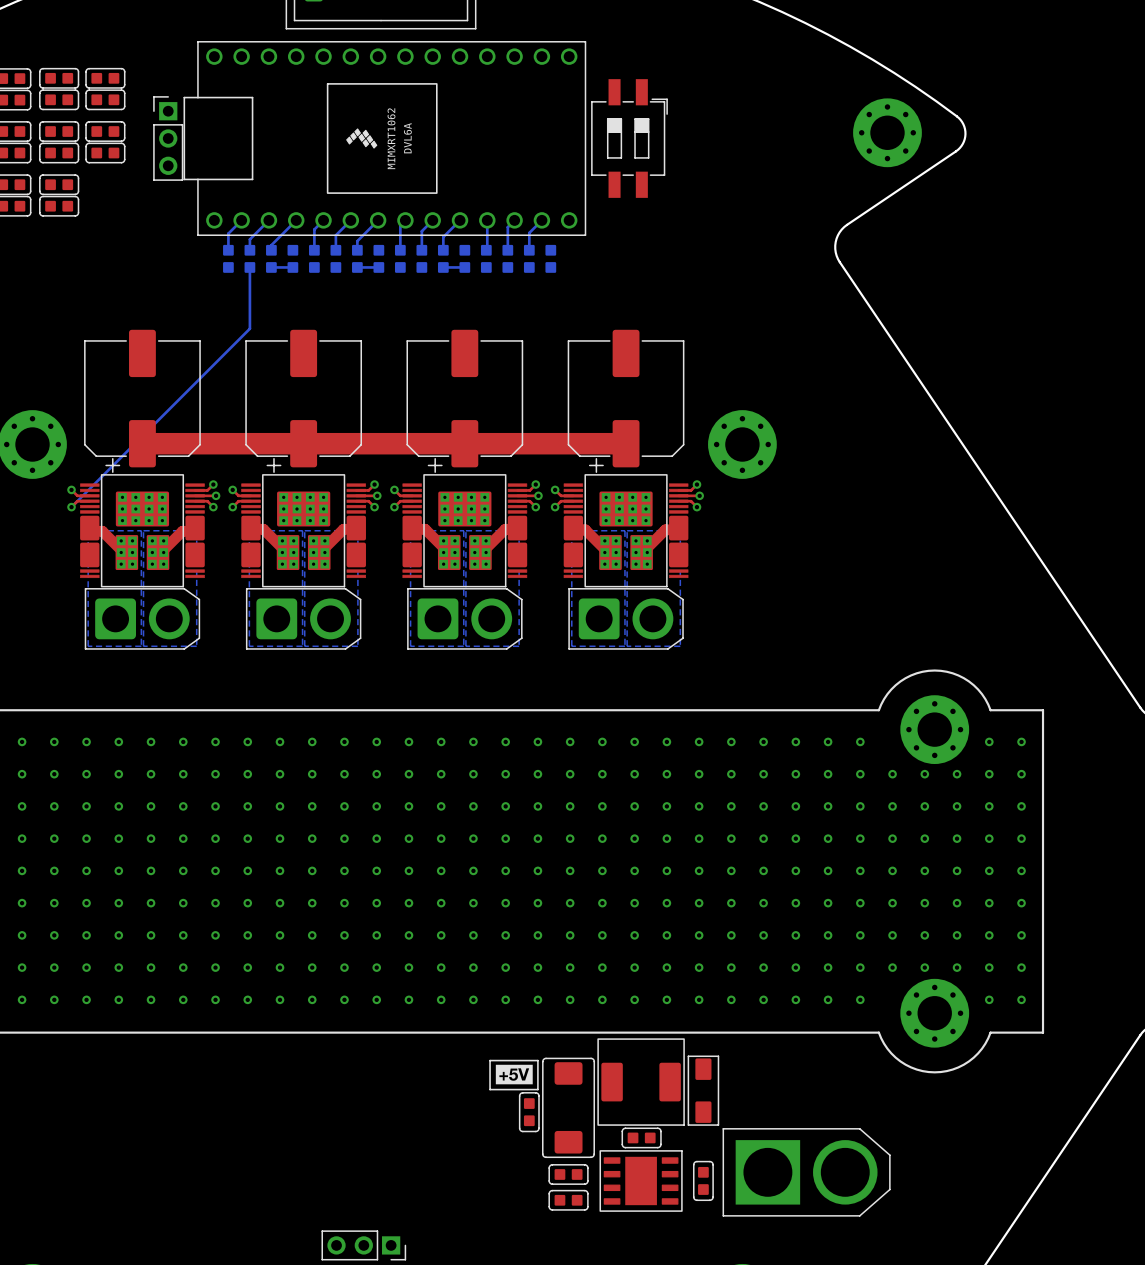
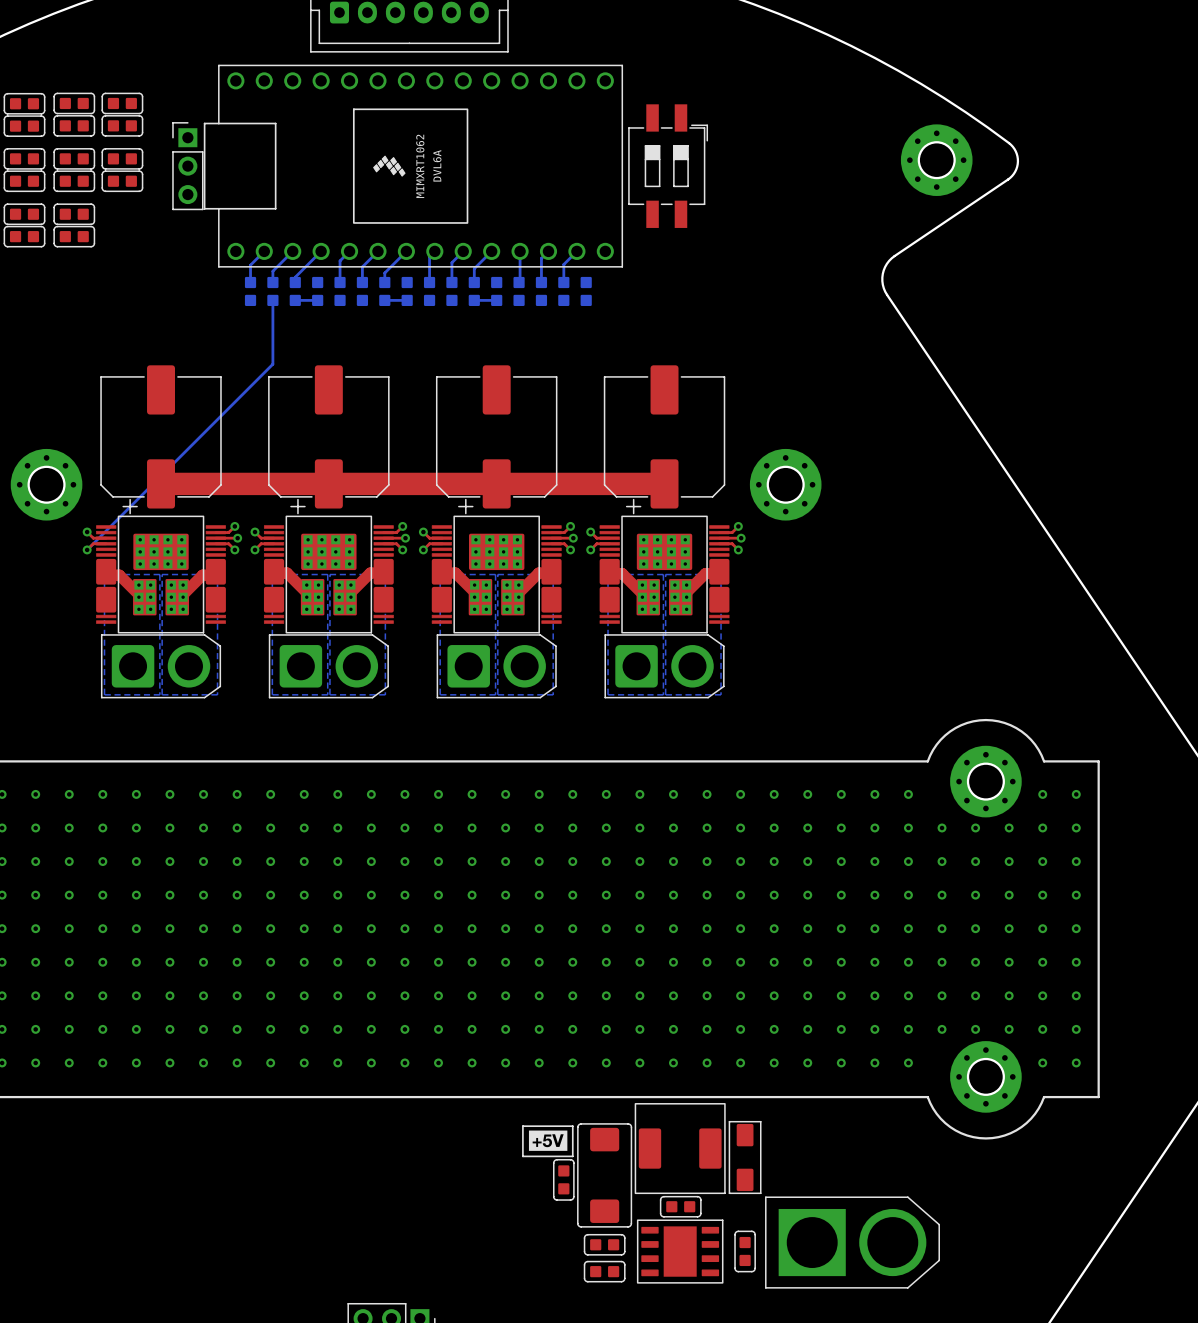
round board edge: none -> [917, 141, 956, 180]
round board edge: none -> [27, 465, 66, 504]
round board edge: none -> [766, 465, 805, 504]
round board edge: none -> [966, 762, 1005, 801]
round board edge: none -> [966, 1057, 1005, 1096]

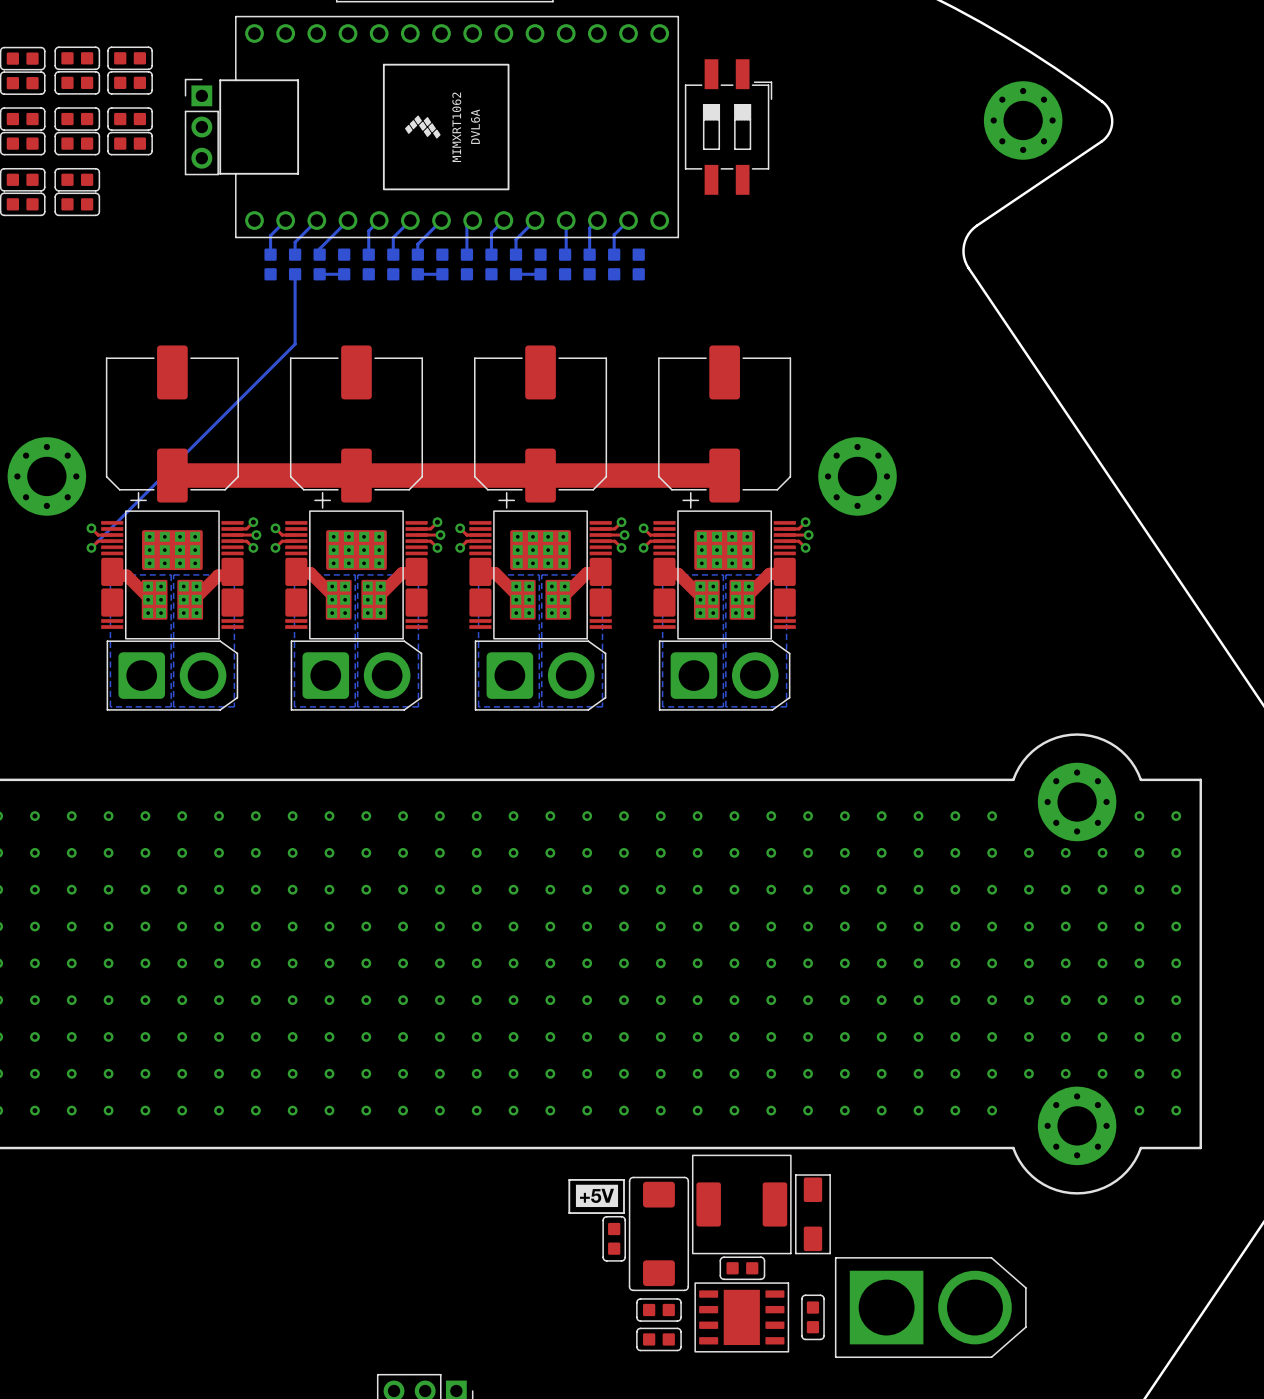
round board edge: [917, 141, 956, 180] -> none
round board edge: [27, 465, 66, 504] -> none
round board edge: [766, 465, 805, 504] -> none
round board edge: [966, 762, 1005, 801] -> none
round board edge: [966, 1057, 1005, 1096] -> none

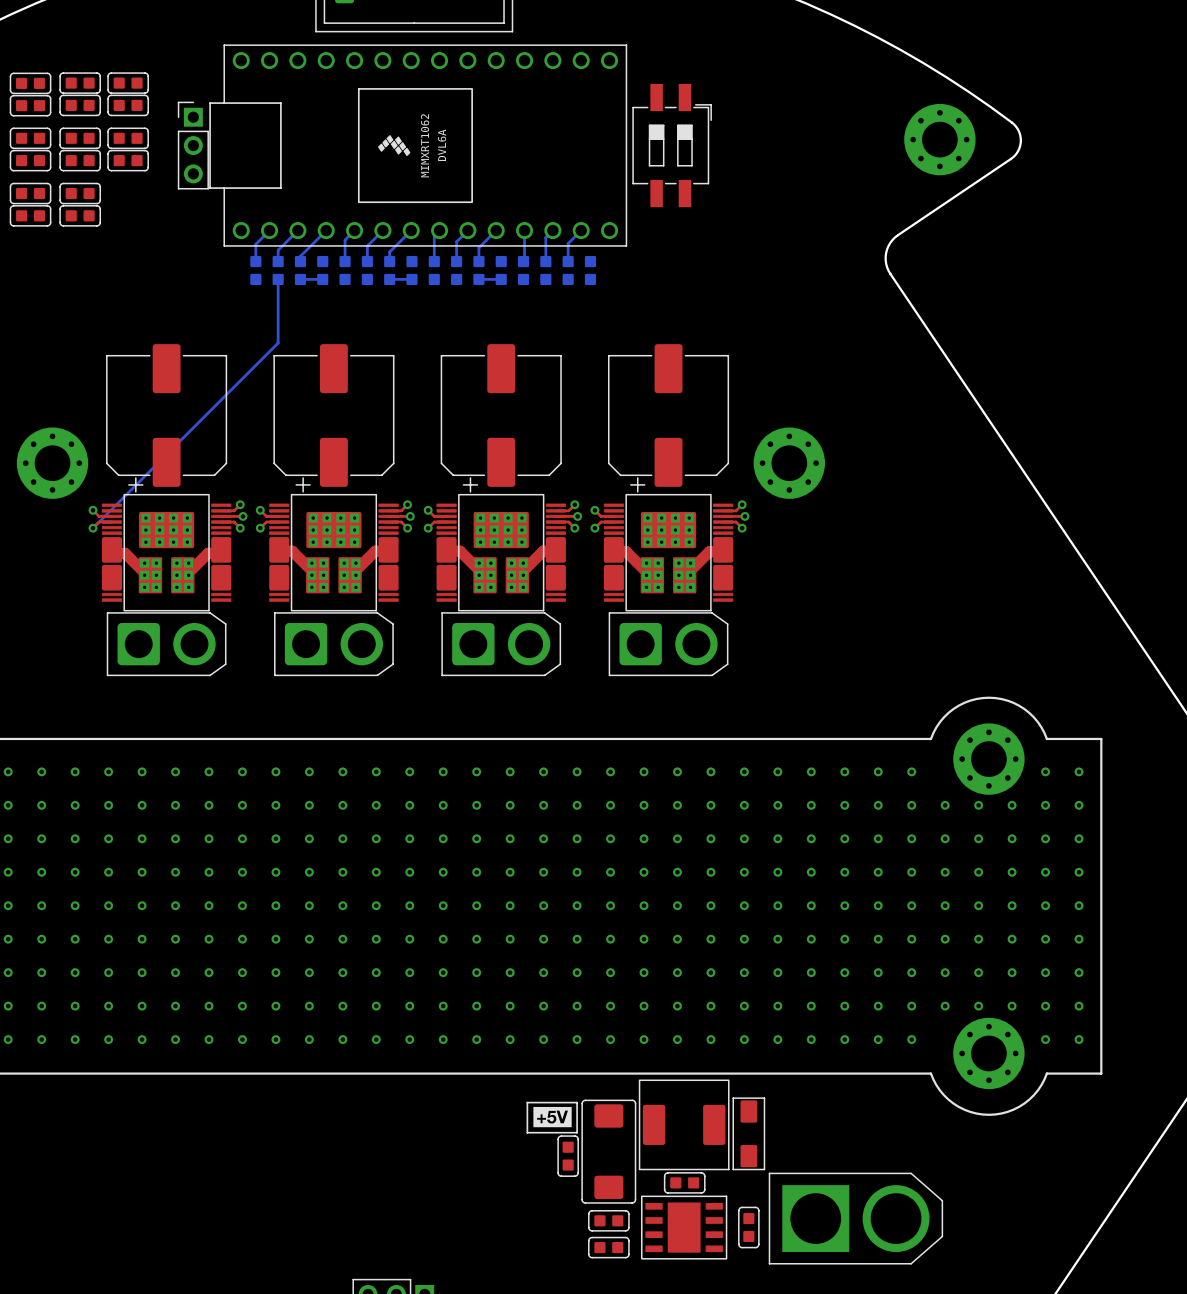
top track: (172, 475) (724, 475) -> none
bottom zone outline: (110, 574) (171, 574) (171, 706) (110, 706) (110, 574) -> none
bottom zone outline: (173, 574) (234, 574) (234, 706) (173, 706) (173, 574) -> none
bottom zone outline: (294, 574) (355, 574) (355, 706) (294, 706) (294, 574) -> none
bottom zone outline: (357, 574) (418, 574) (418, 706) (357, 706) (357, 574) -> none
bottom zone outline: (478, 574) (539, 574) (539, 706) (478, 706) (478, 574) -> none
bottom zone outline: (541, 574) (602, 574) (602, 706) (541, 706) (541, 574) -> none
bottom zone outline: (662, 574) (723, 574) (723, 706) (662, 706) (662, 574) -> none
bottom zone outline: (725, 574) (725, 706) (786, 706) (786, 574) (725, 574) -> none

